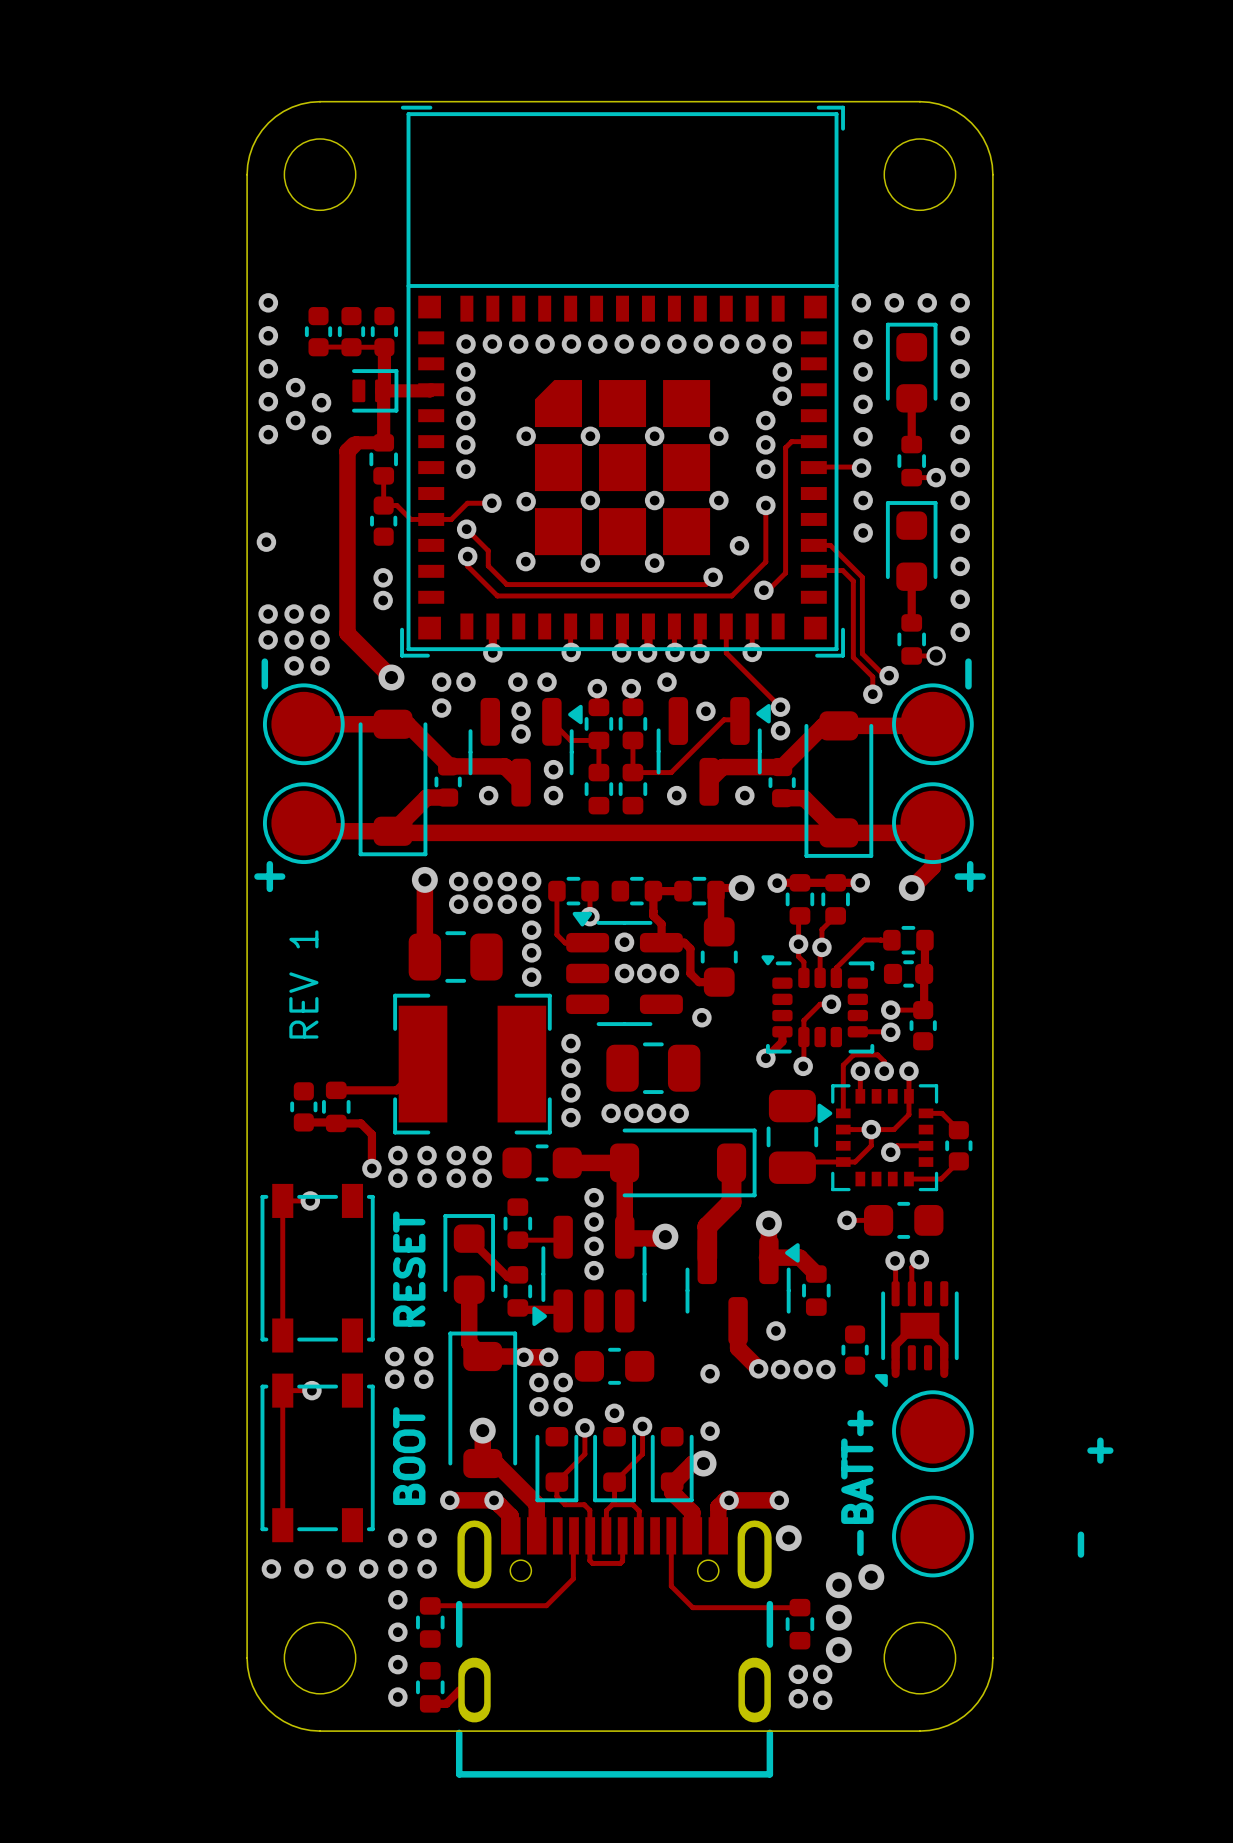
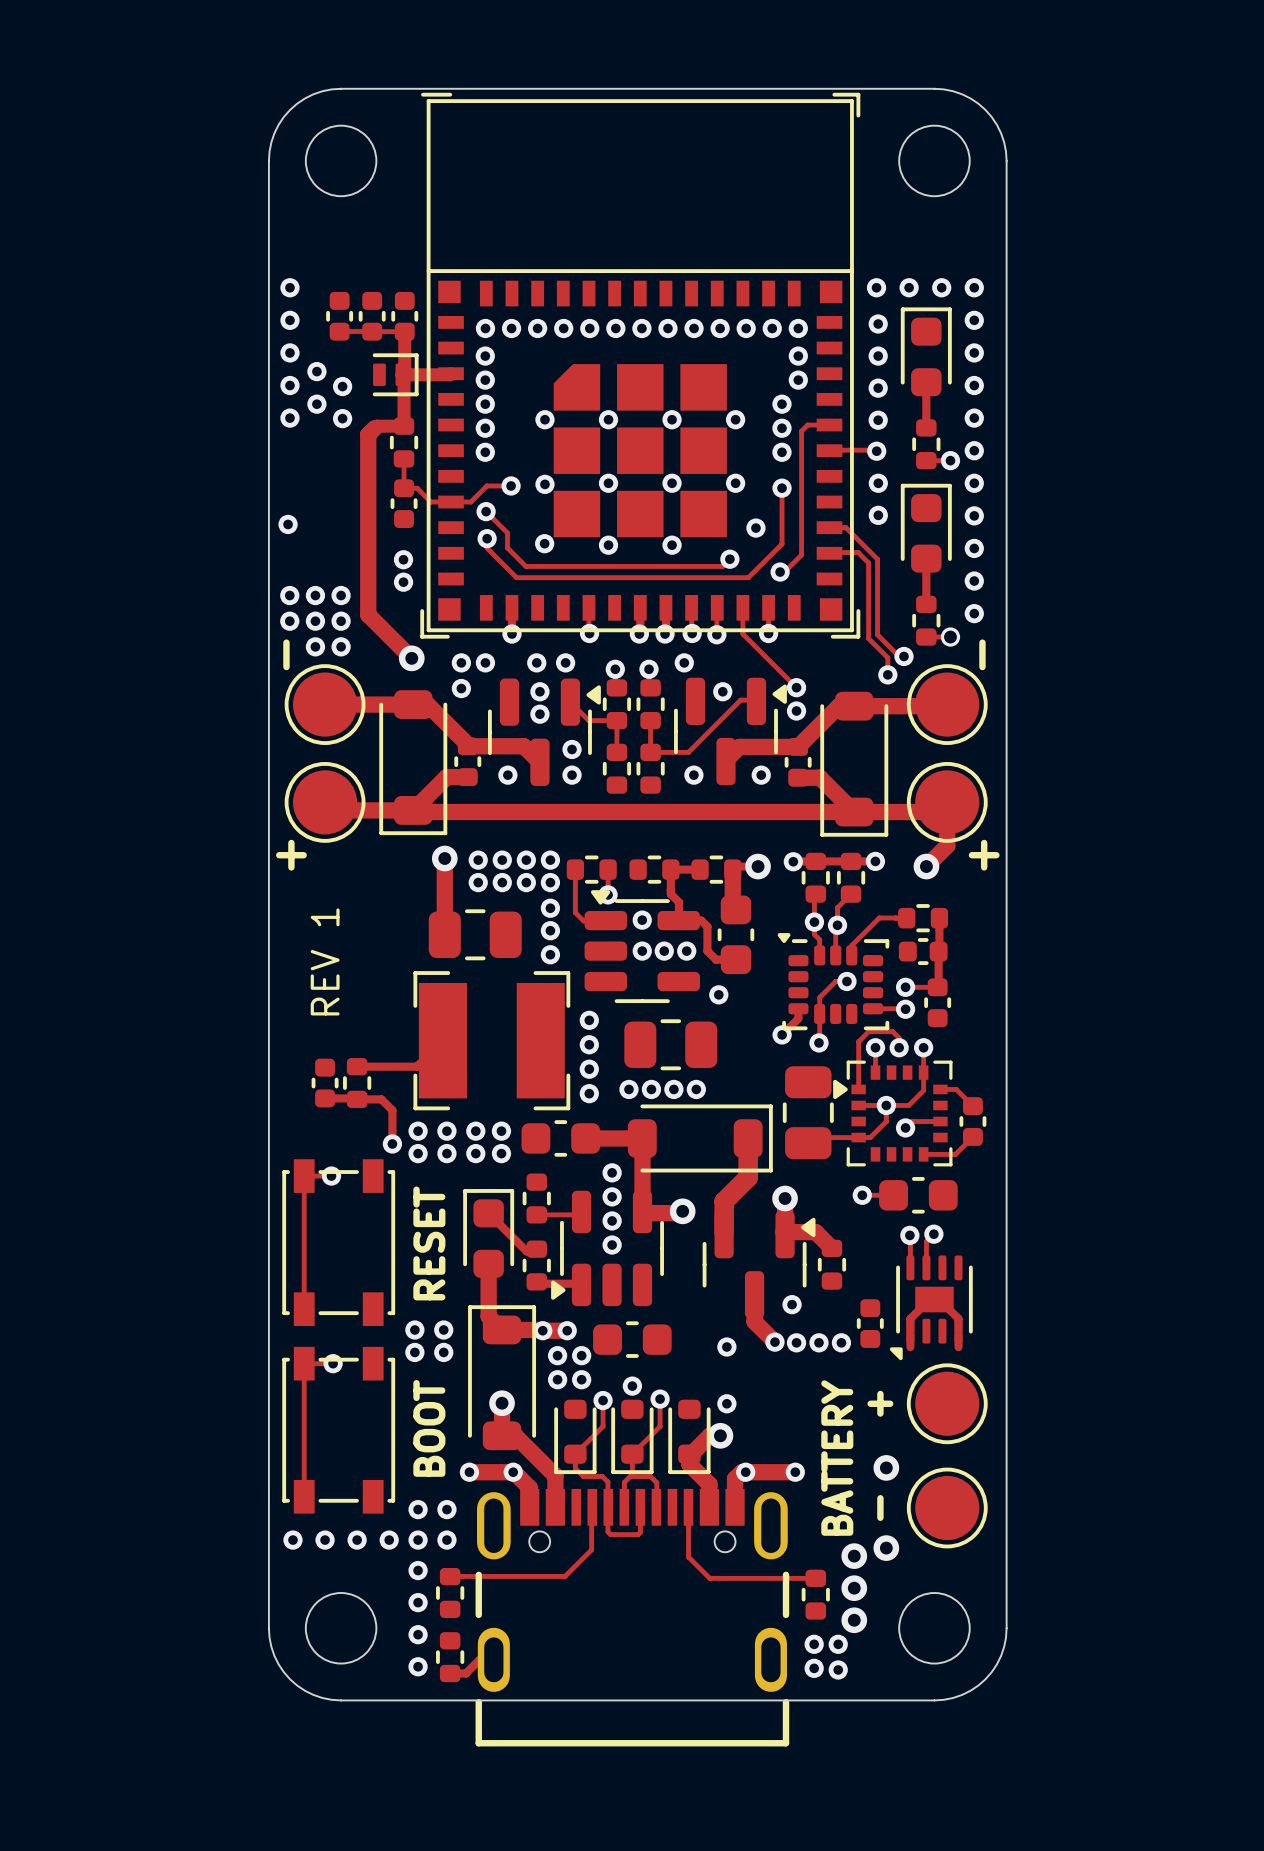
text position: + (1100, 1450) -> + (880, 1403)
text: -BATT+ (857, 1483) -> BATTERY (837, 1458)
via position: (788, 1538) -> (886, 1467)
text position: - (1080, 1544) -> - (880, 1508)

